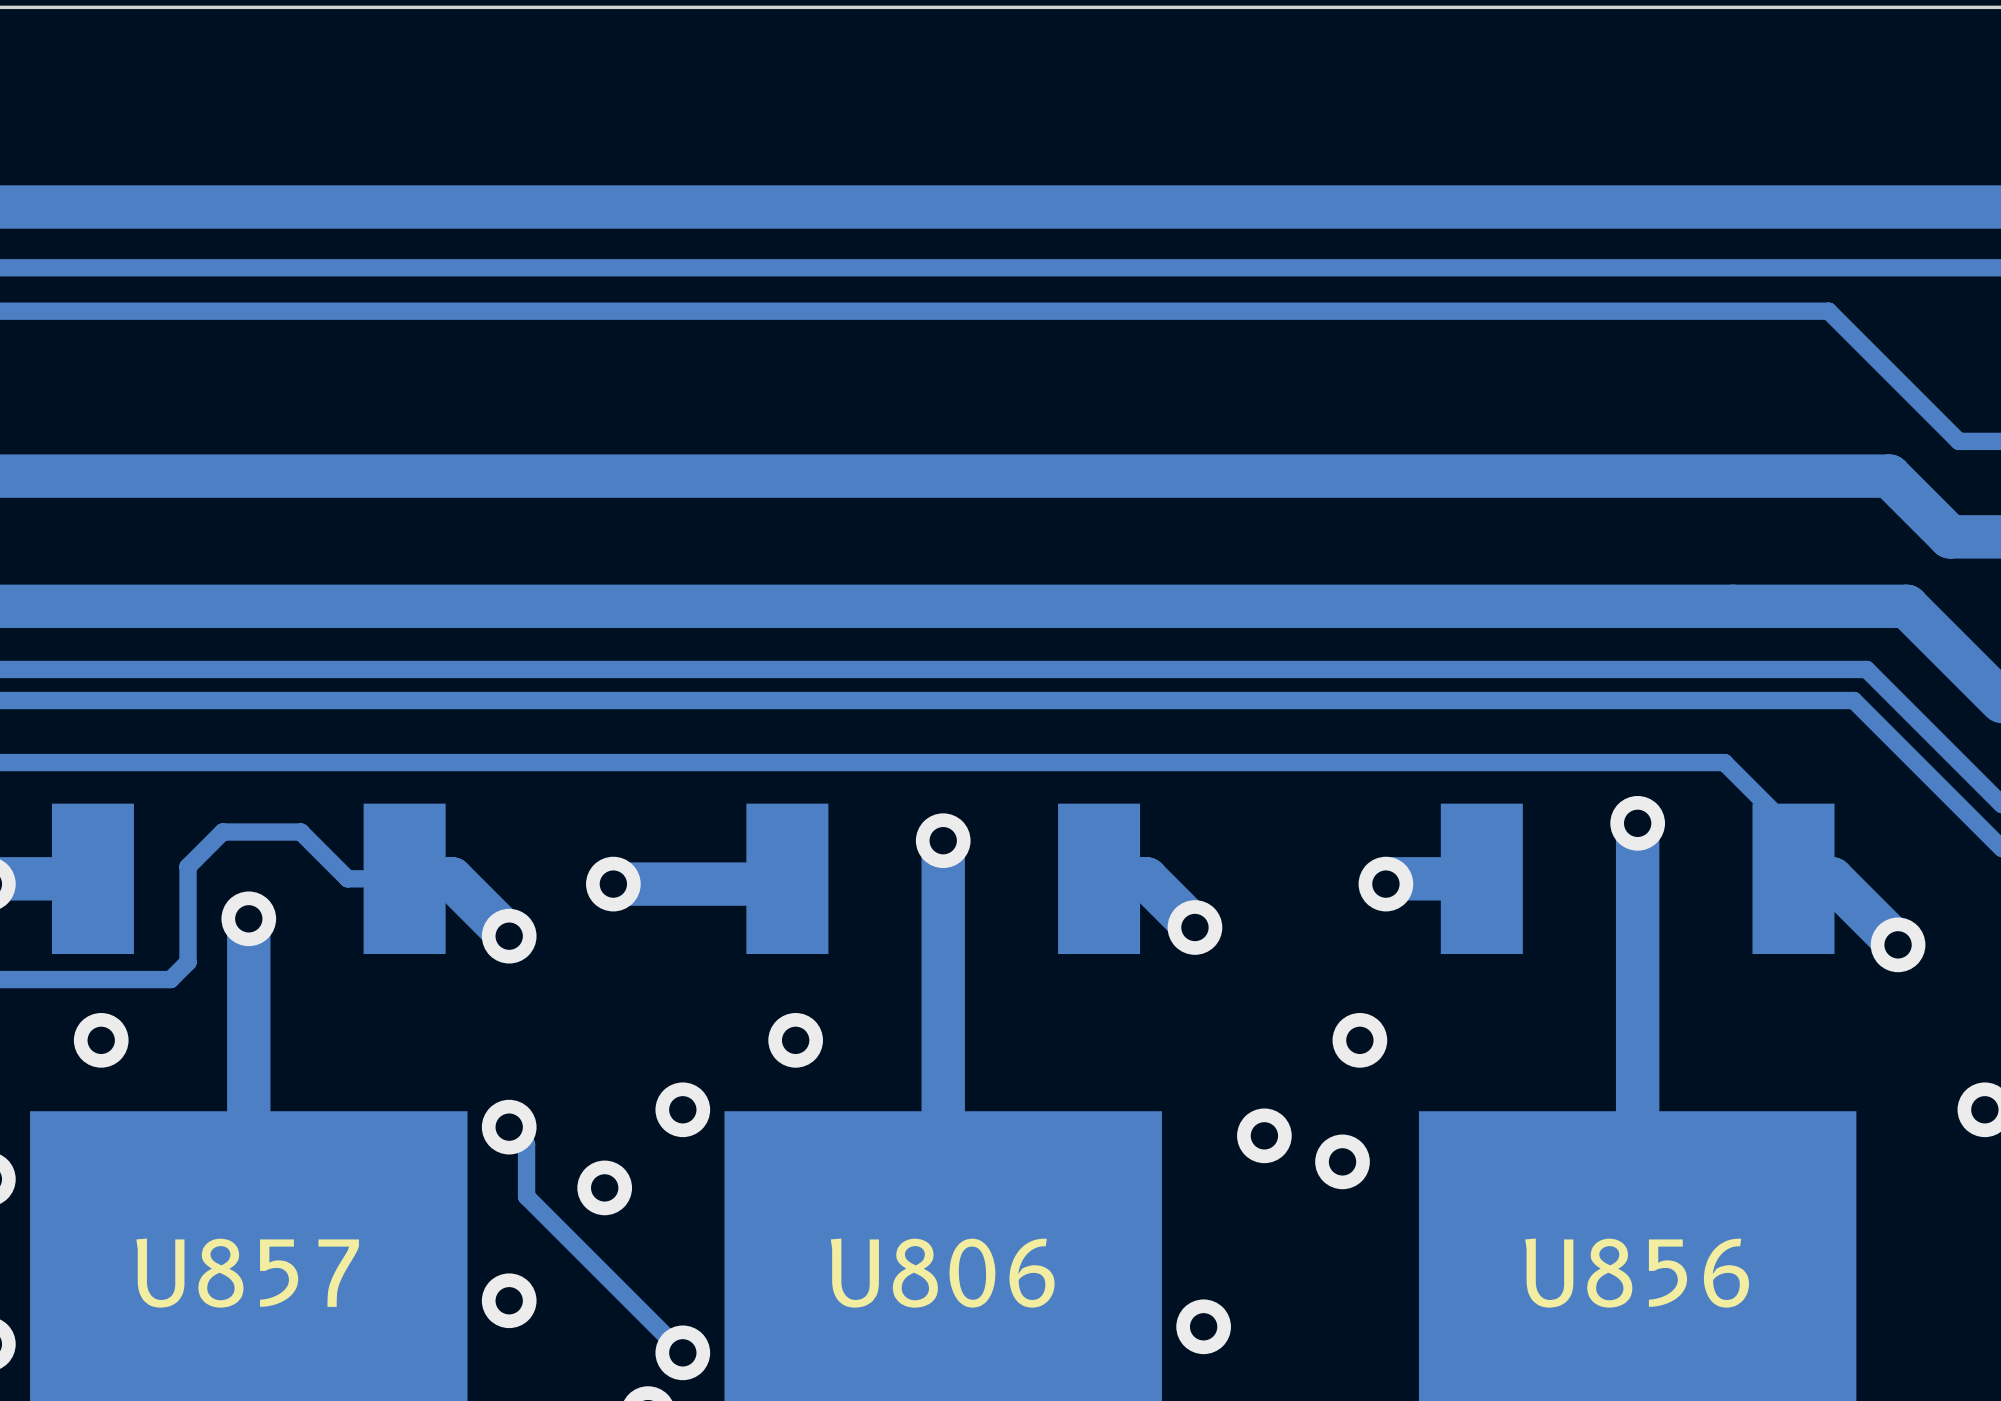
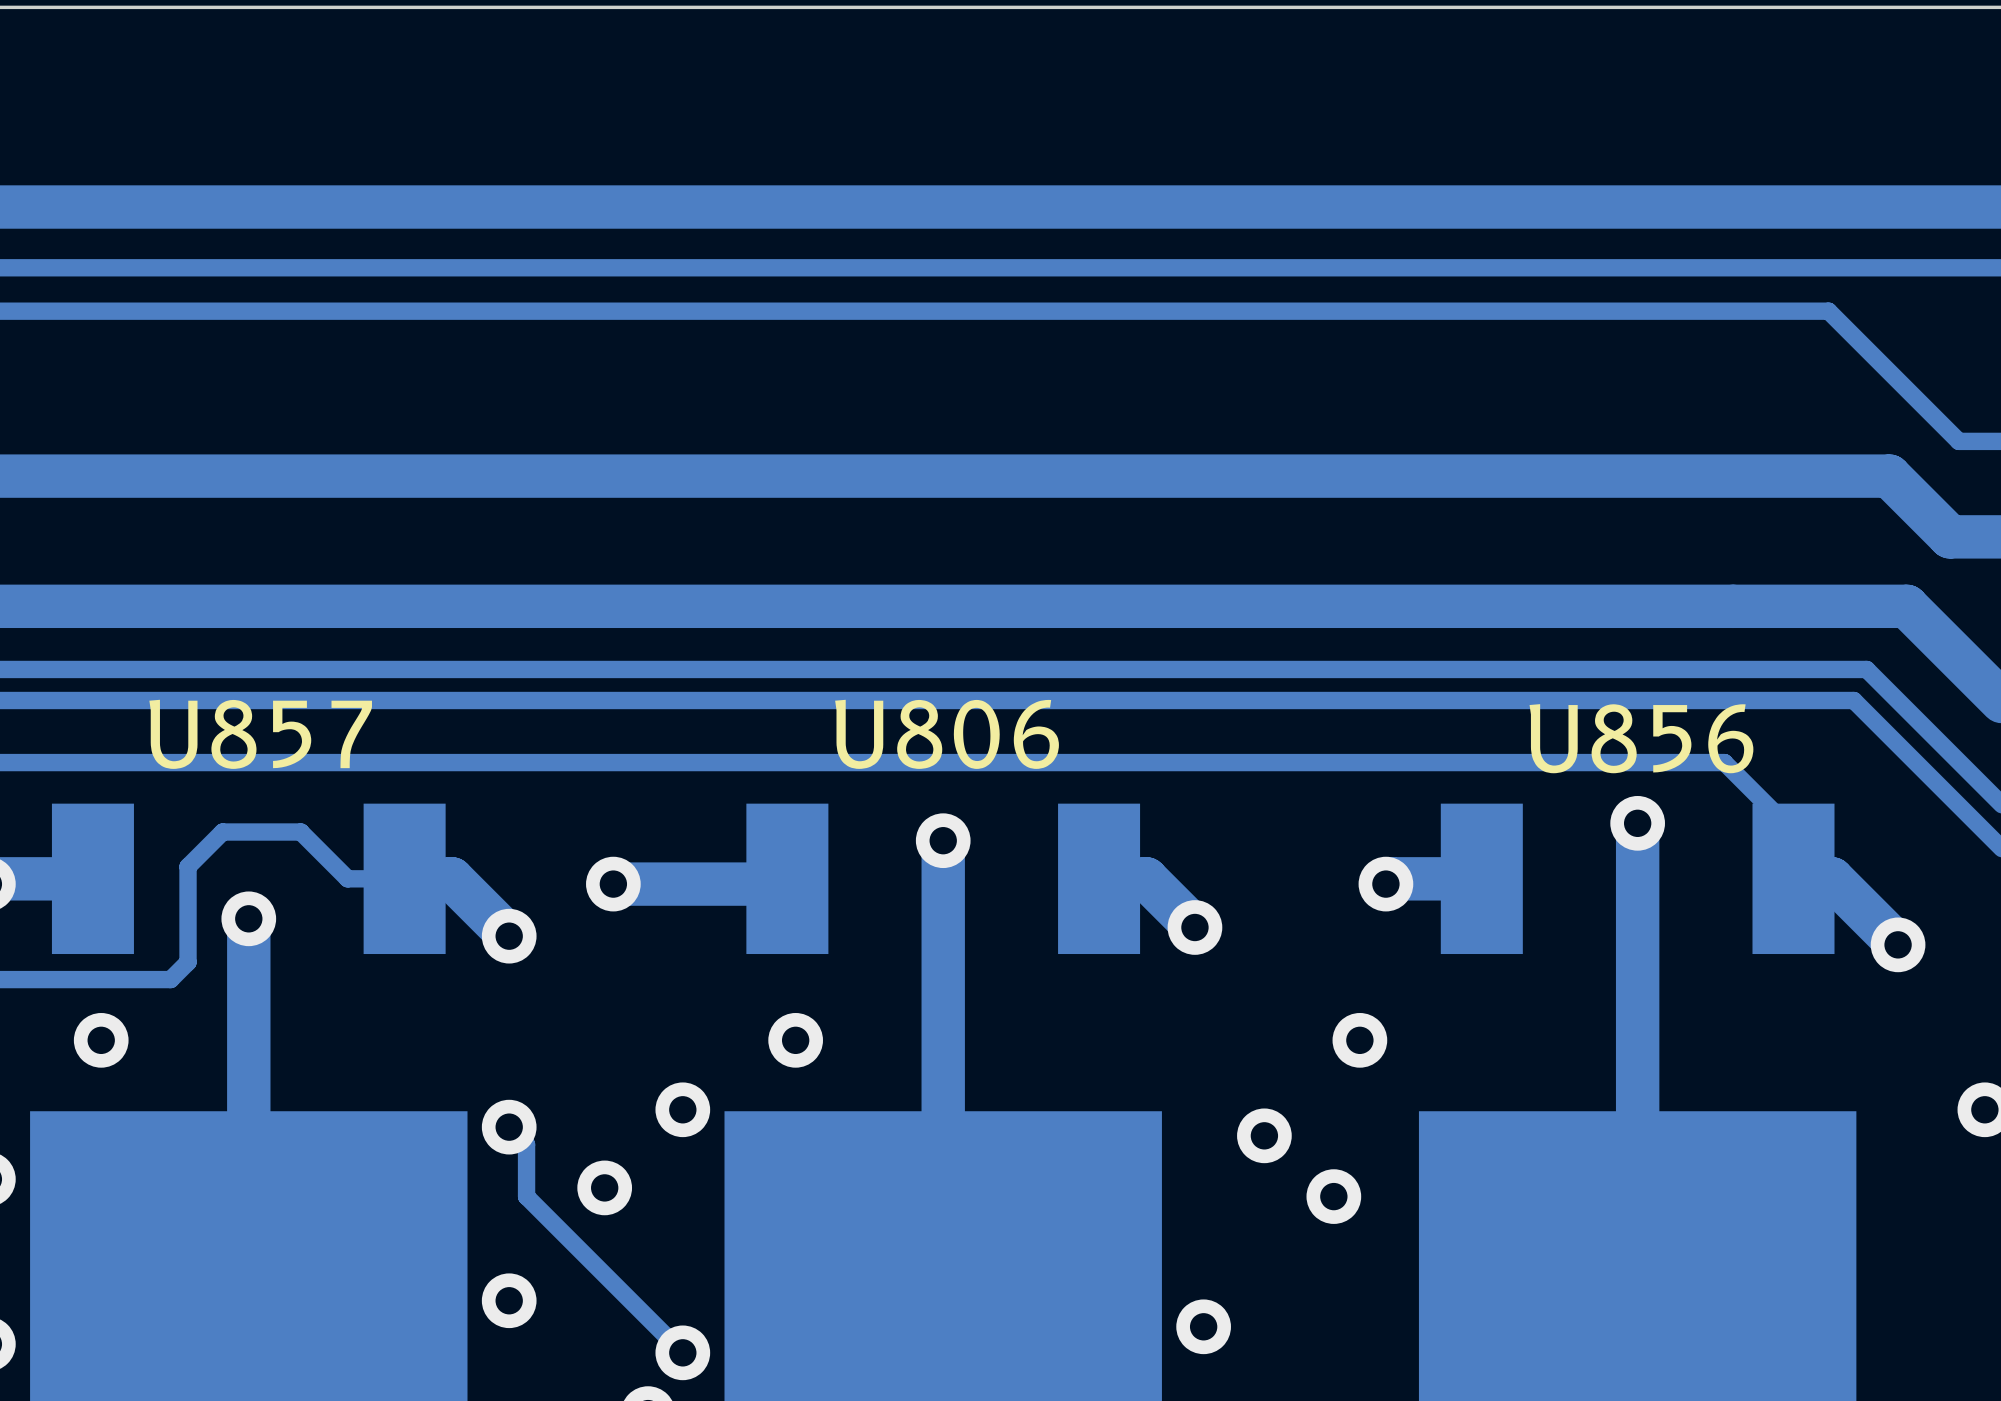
via position: (1342, 1161) -> (1333, 1196)
U857 name position: U857 (247, 1273) -> U857 (260, 734)
U806 name position: U806 (942, 1273) -> U806 (947, 734)
U856 name position: U856 (1637, 1273) -> U856 (1641, 738)

